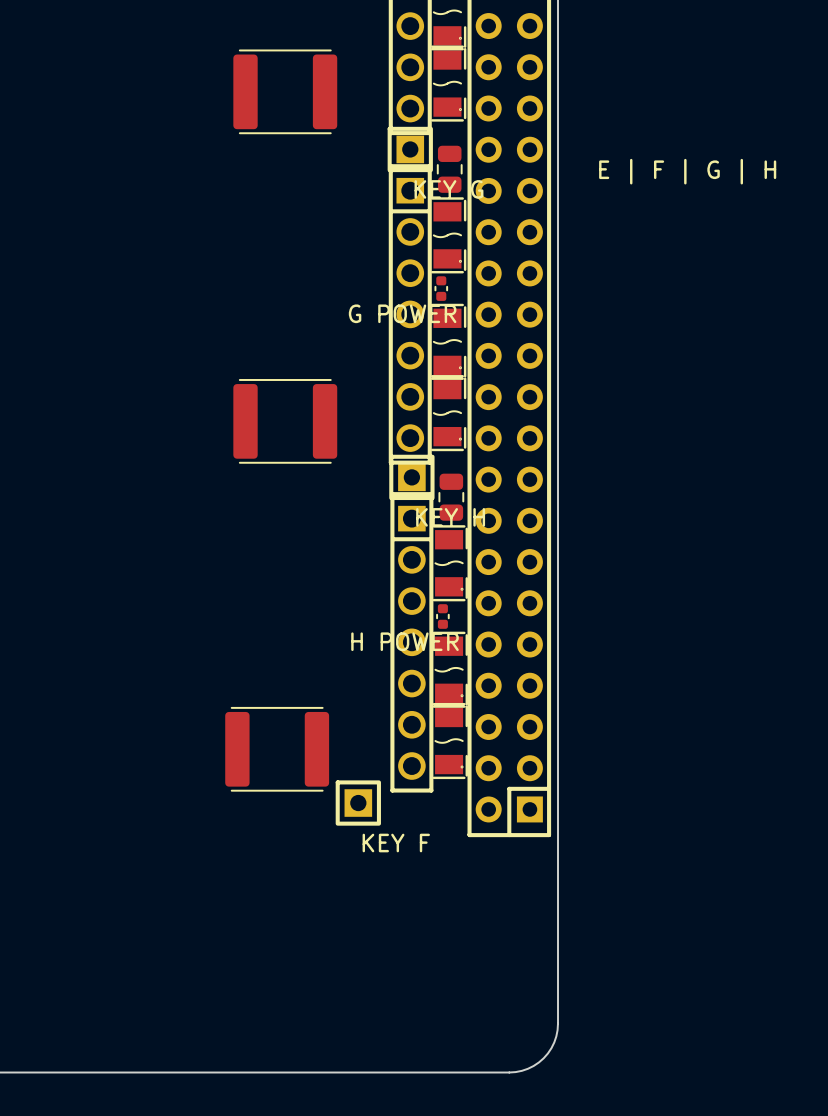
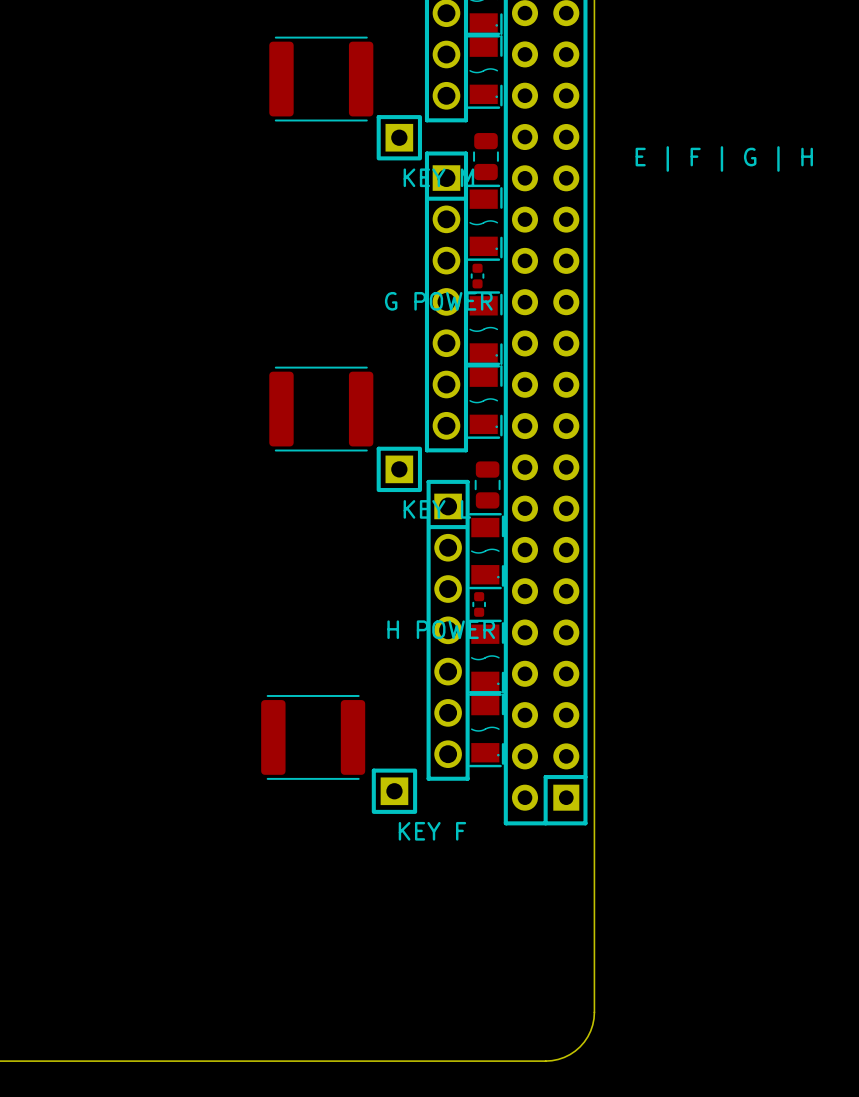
part: (410, 149) -> none
part: none -> (399, 137)
part: (411, 477) -> none
part: none -> (399, 469)

